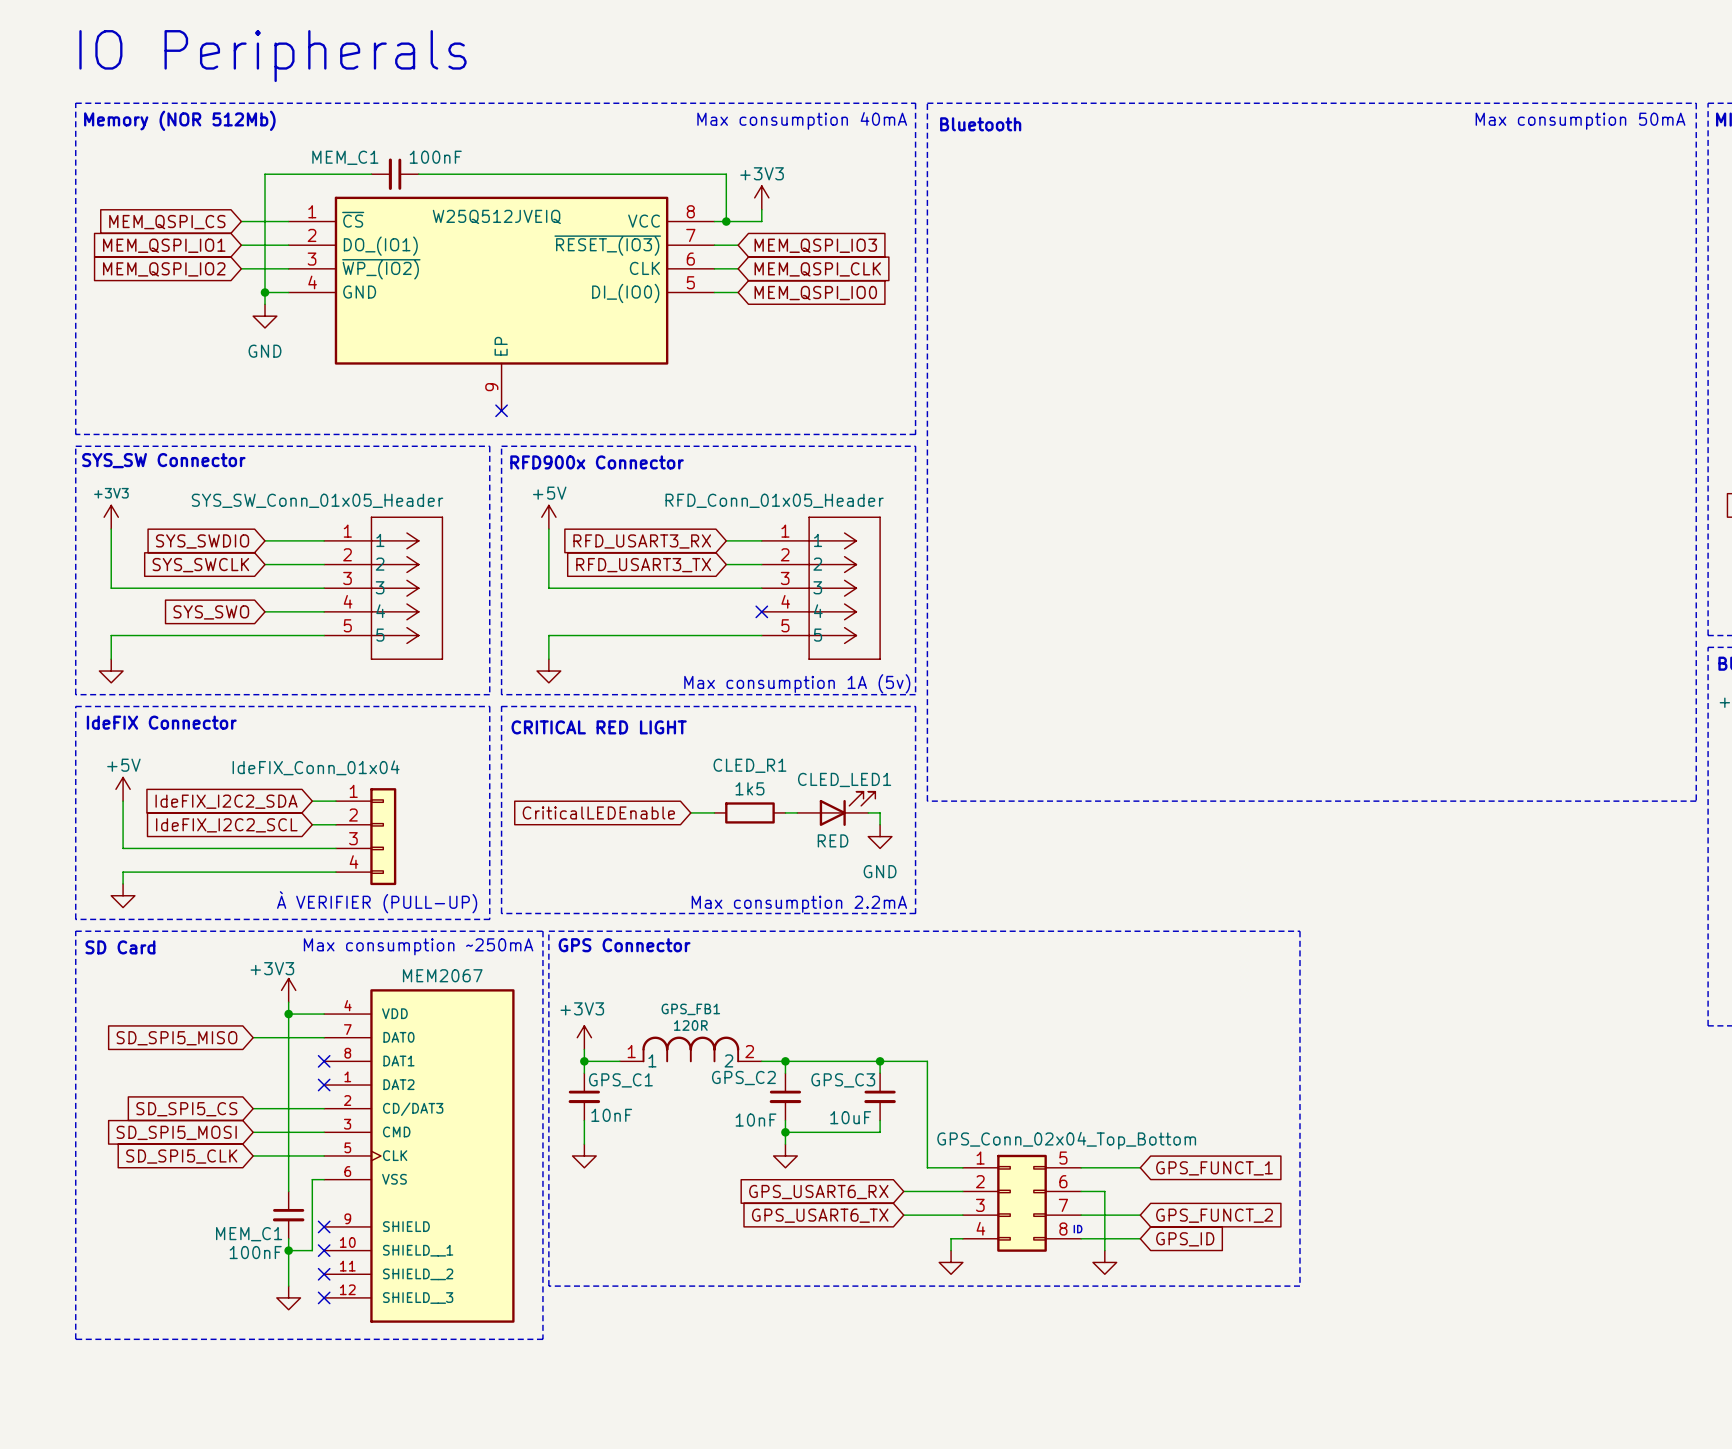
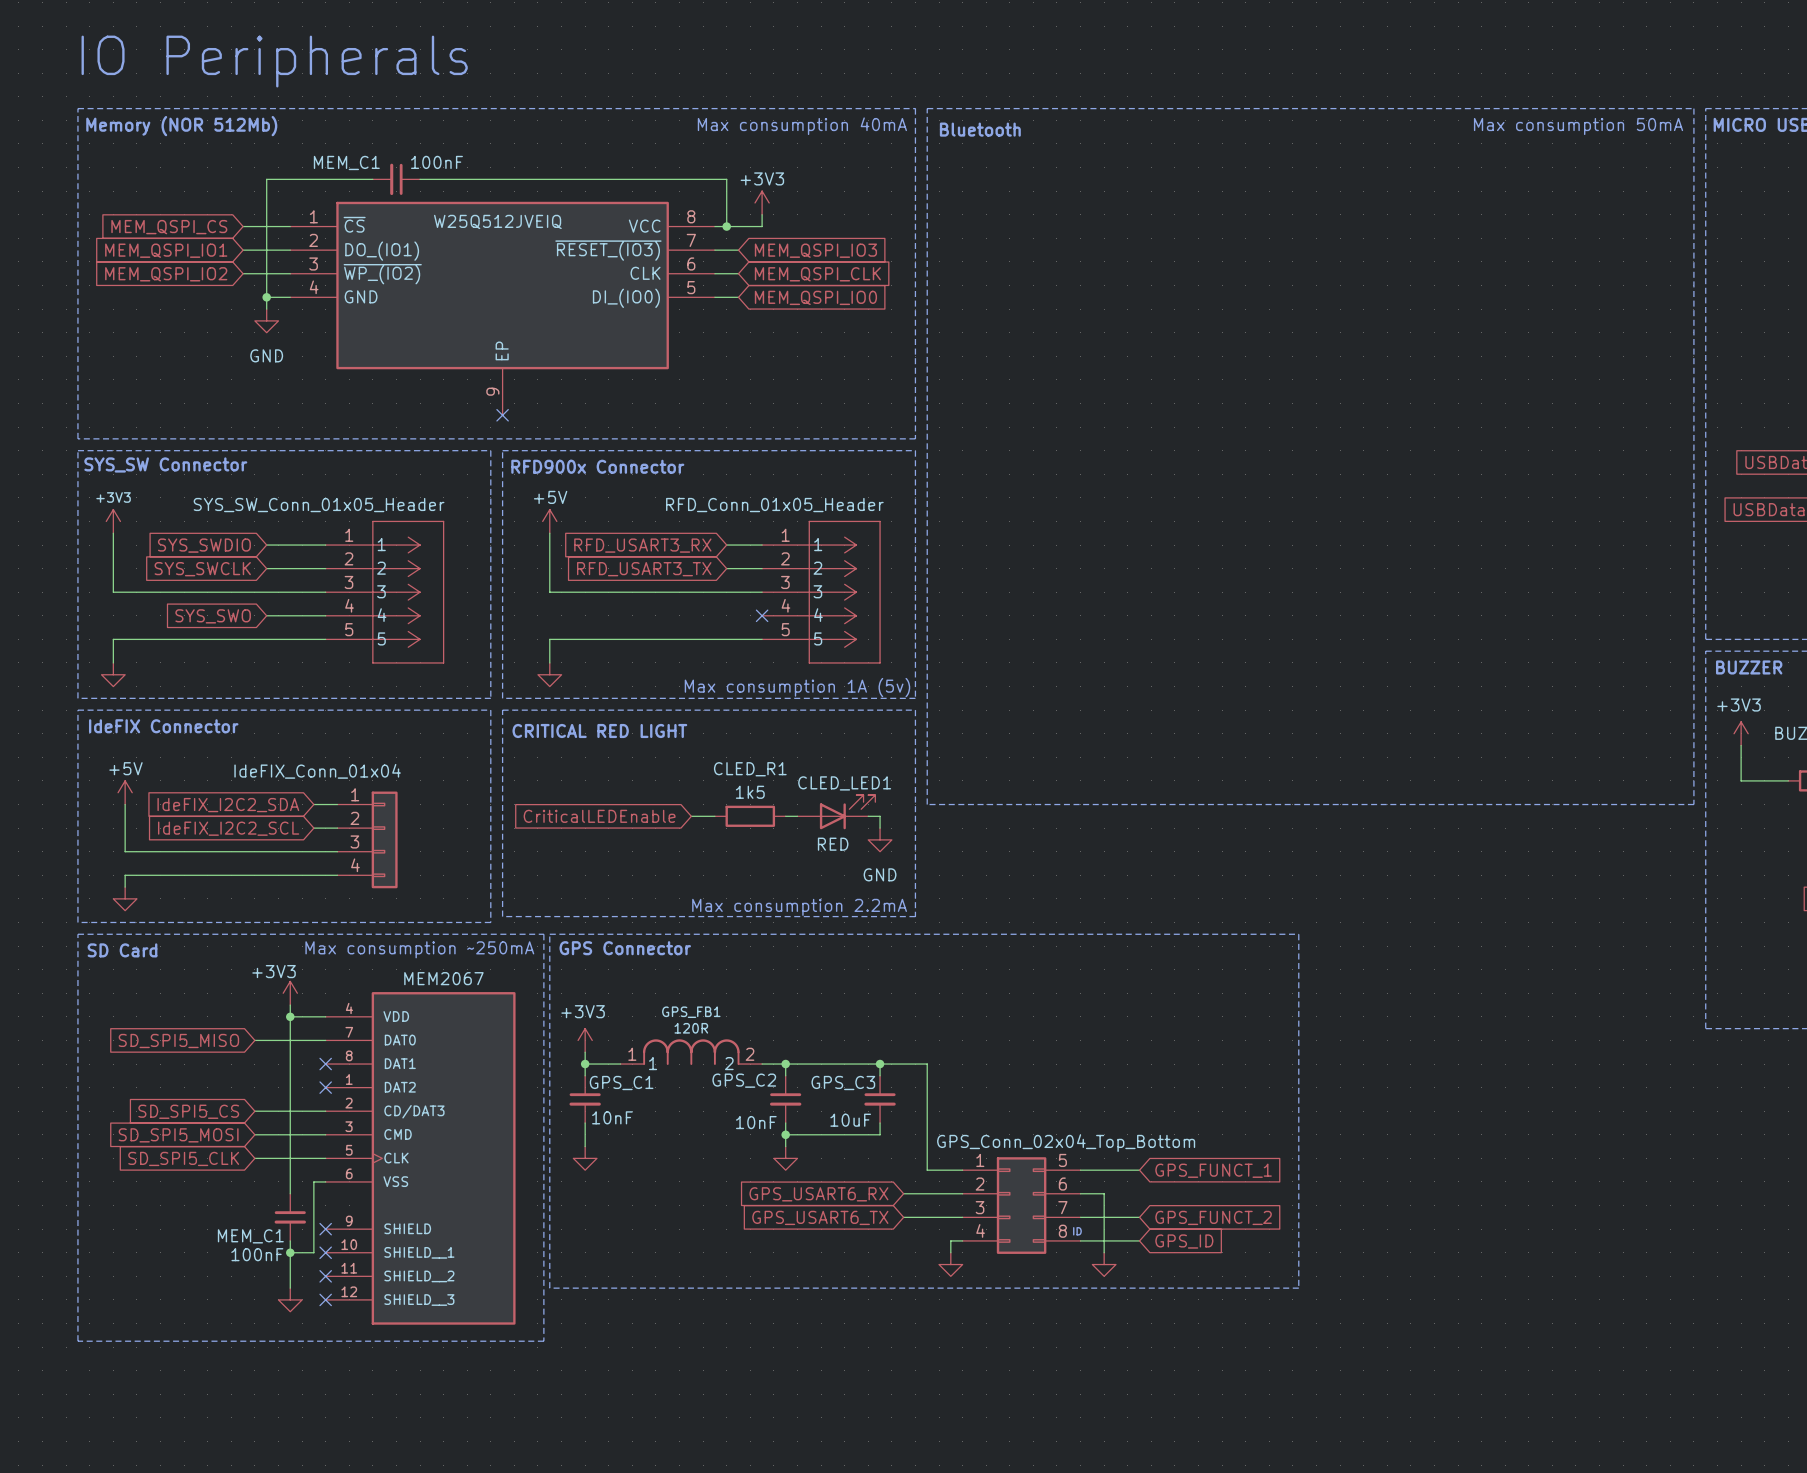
text: À VERIFIER (PULL-UP) (377, 902) -> none

